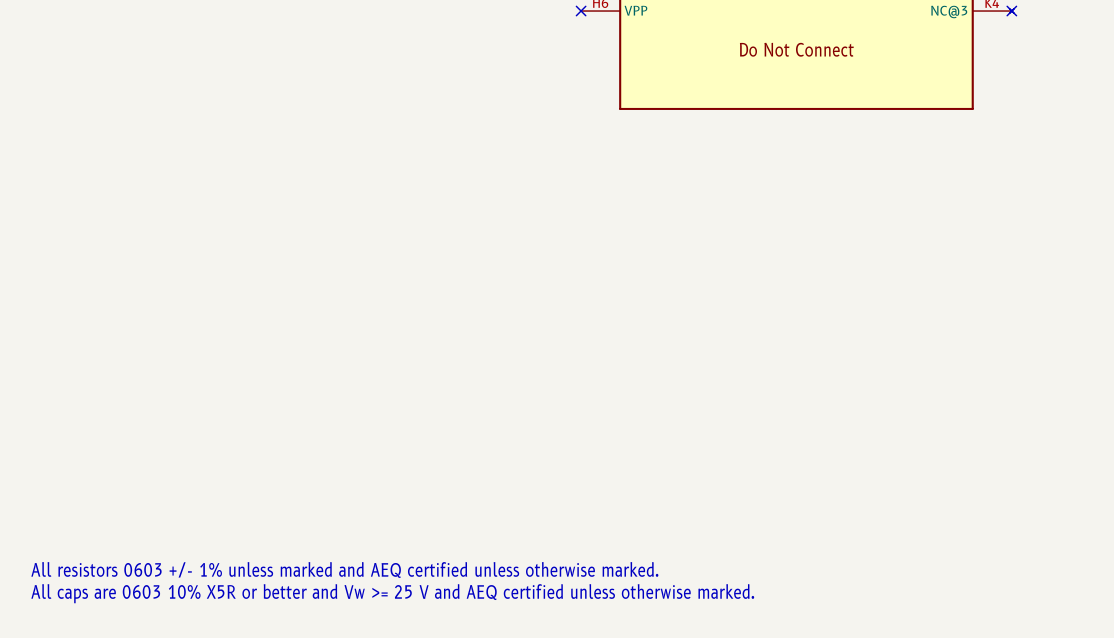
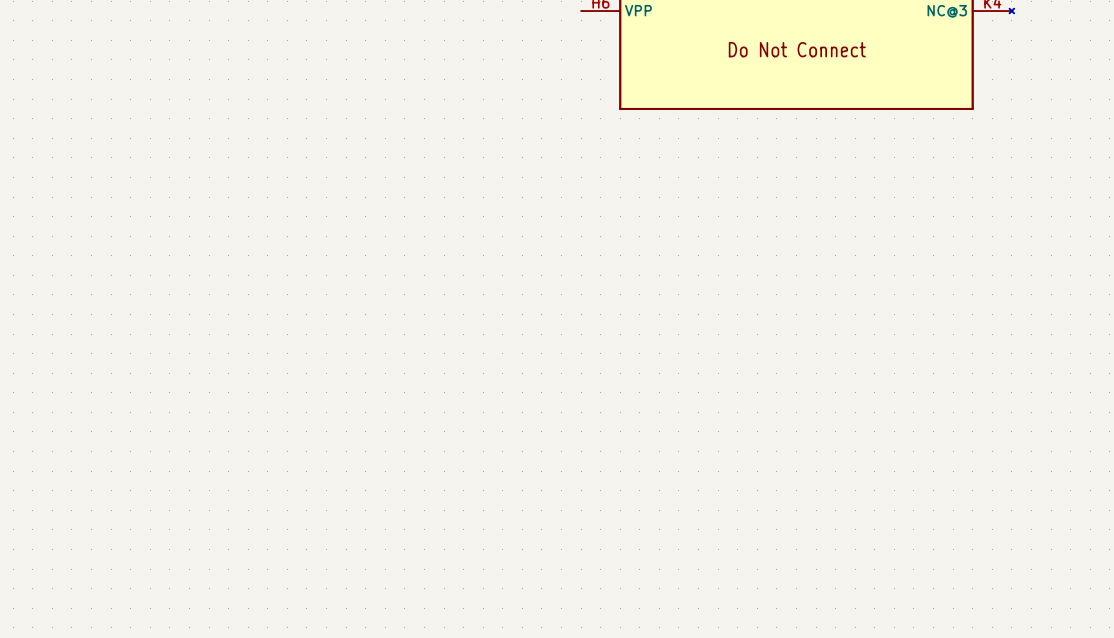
no-connect mark: (581, 11) -> none
no-connect mark: (1011, 11) -> none
text: All resistors 0603 +/- 1% unless marked and AEQ certified unless otherwise marked. (344, 570) -> none
text: All caps are 0603 10% X5R or better and Vw >= 25 V and AEQ certified unless otherwise marked. (392, 593) -> none

